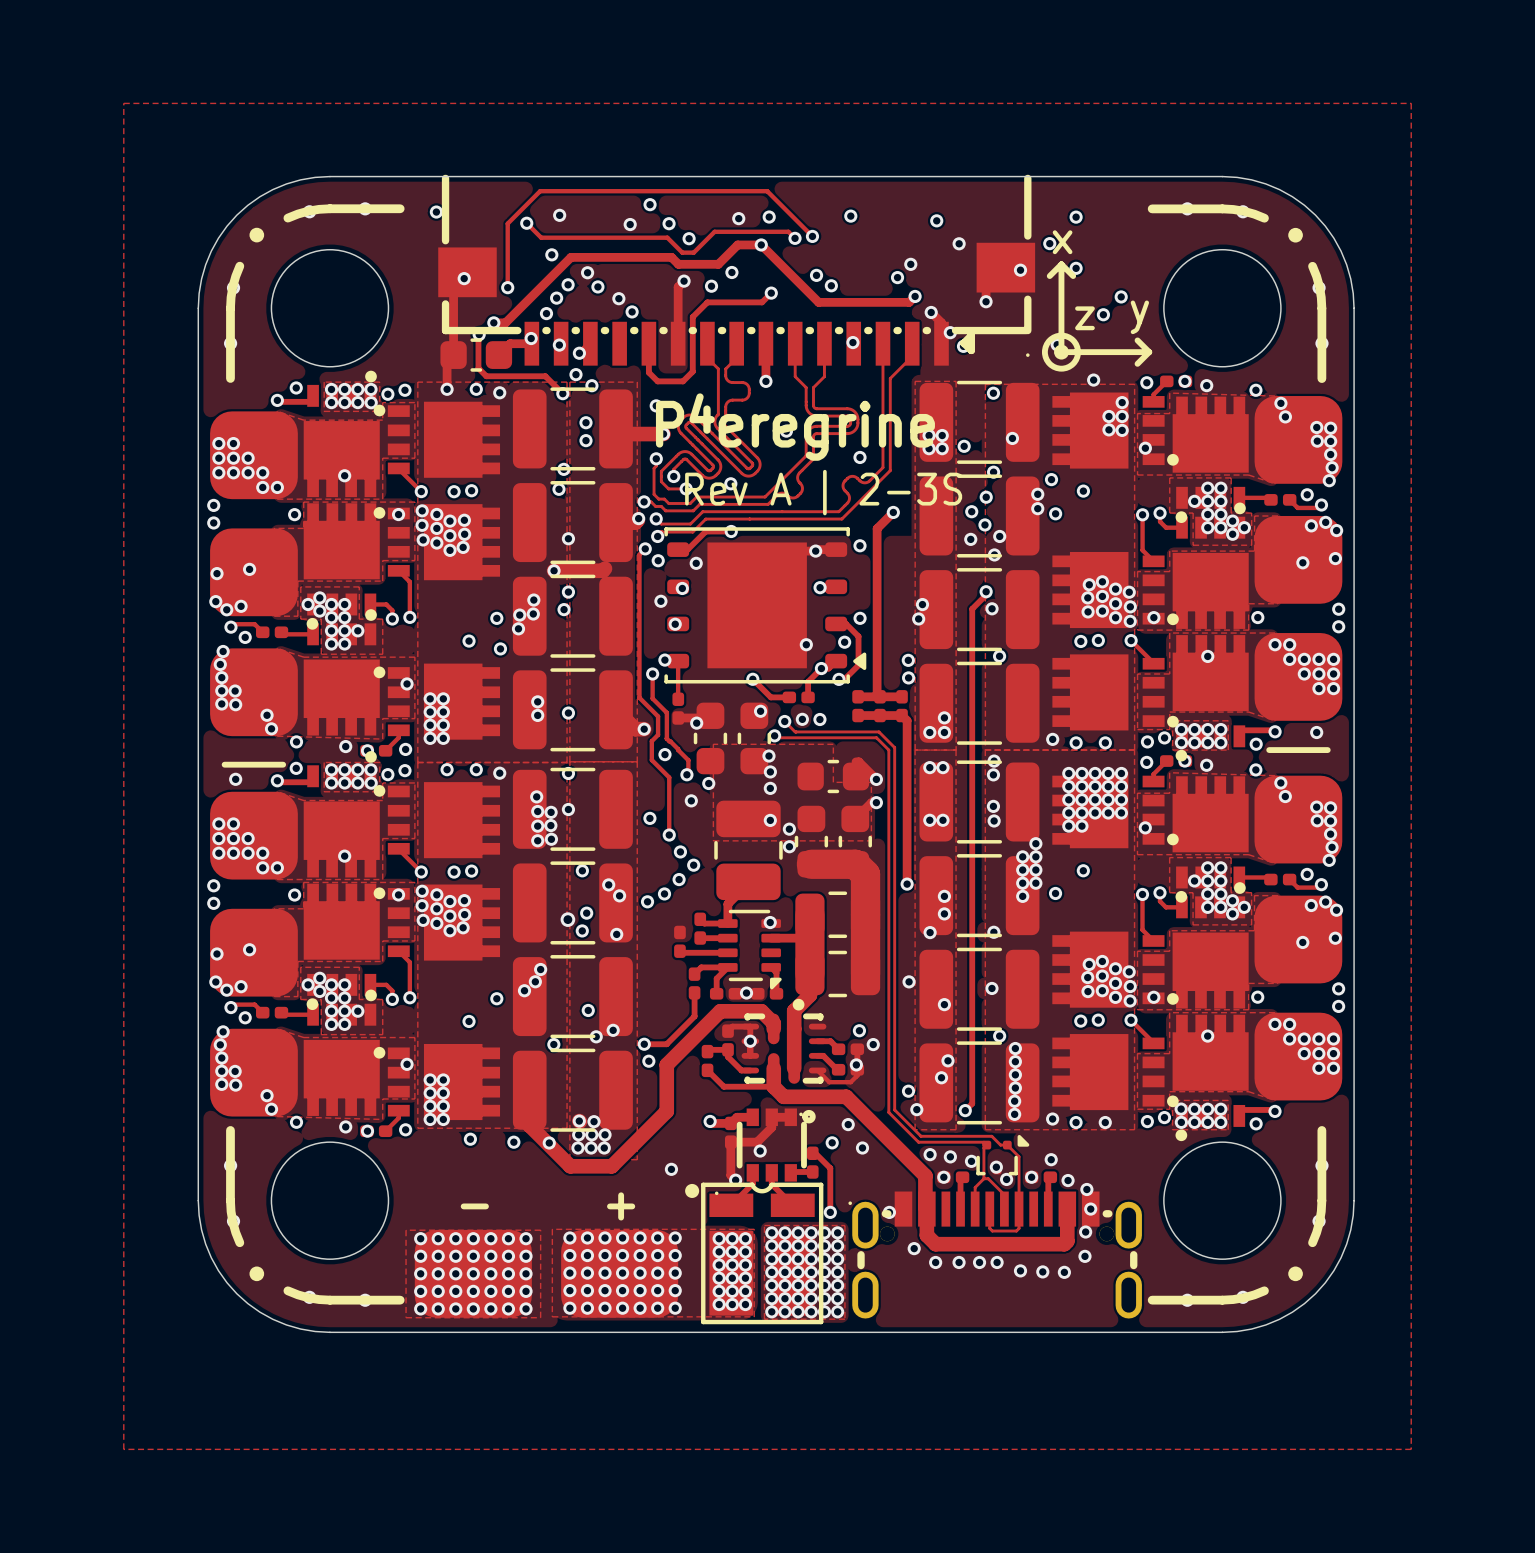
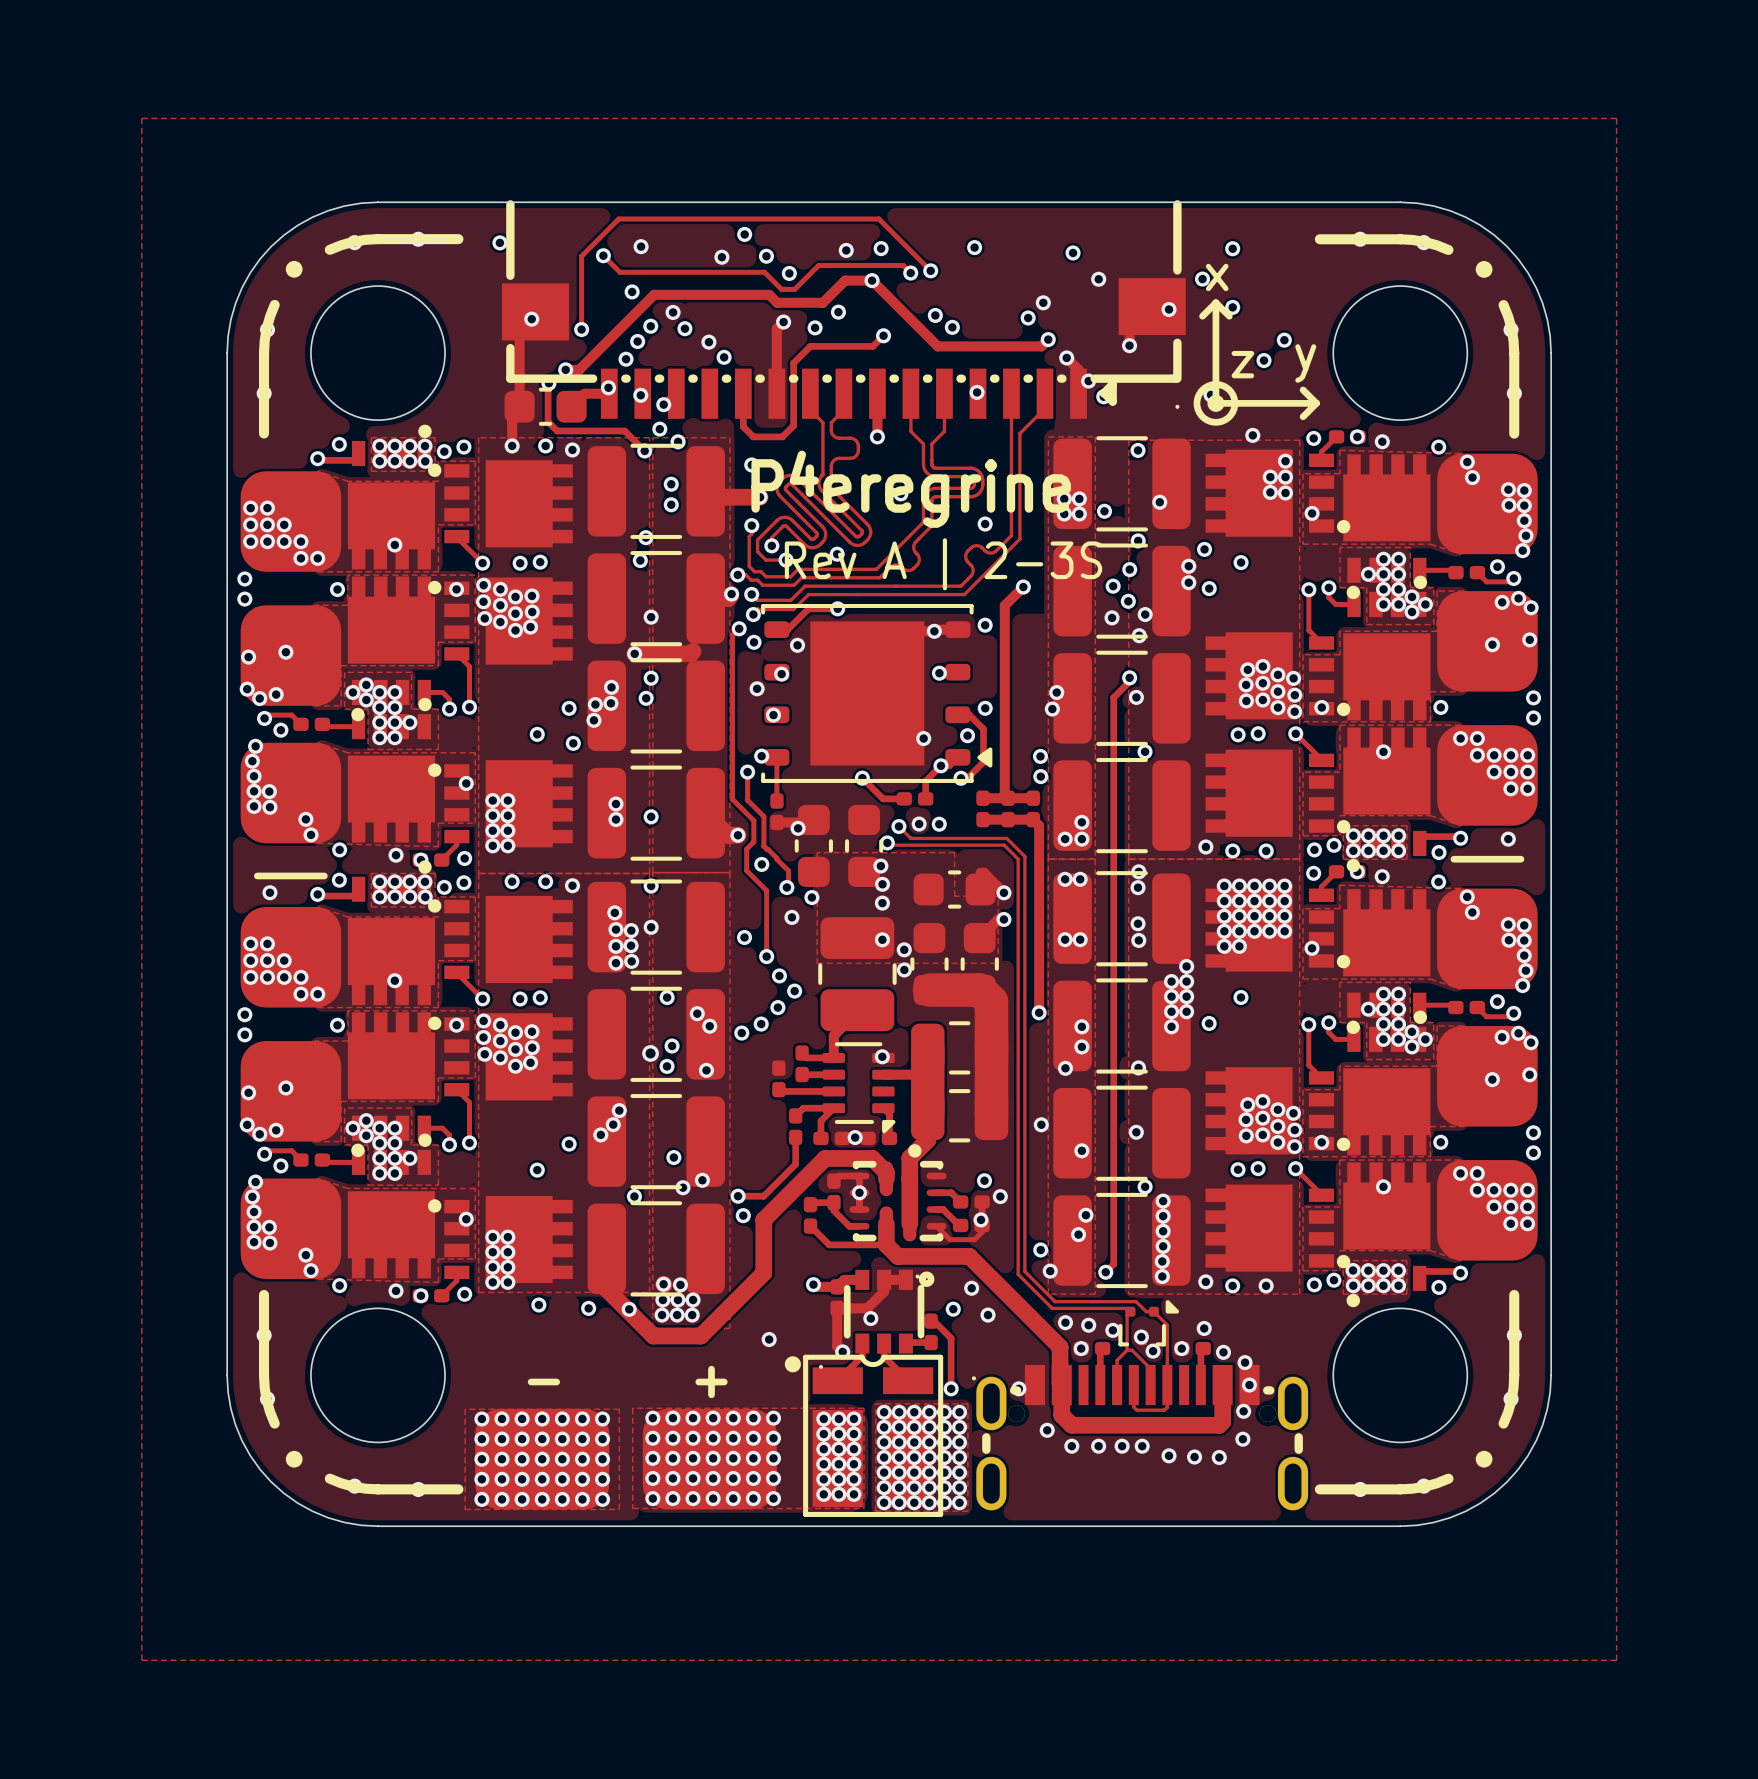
via: (760, 711) -> none

